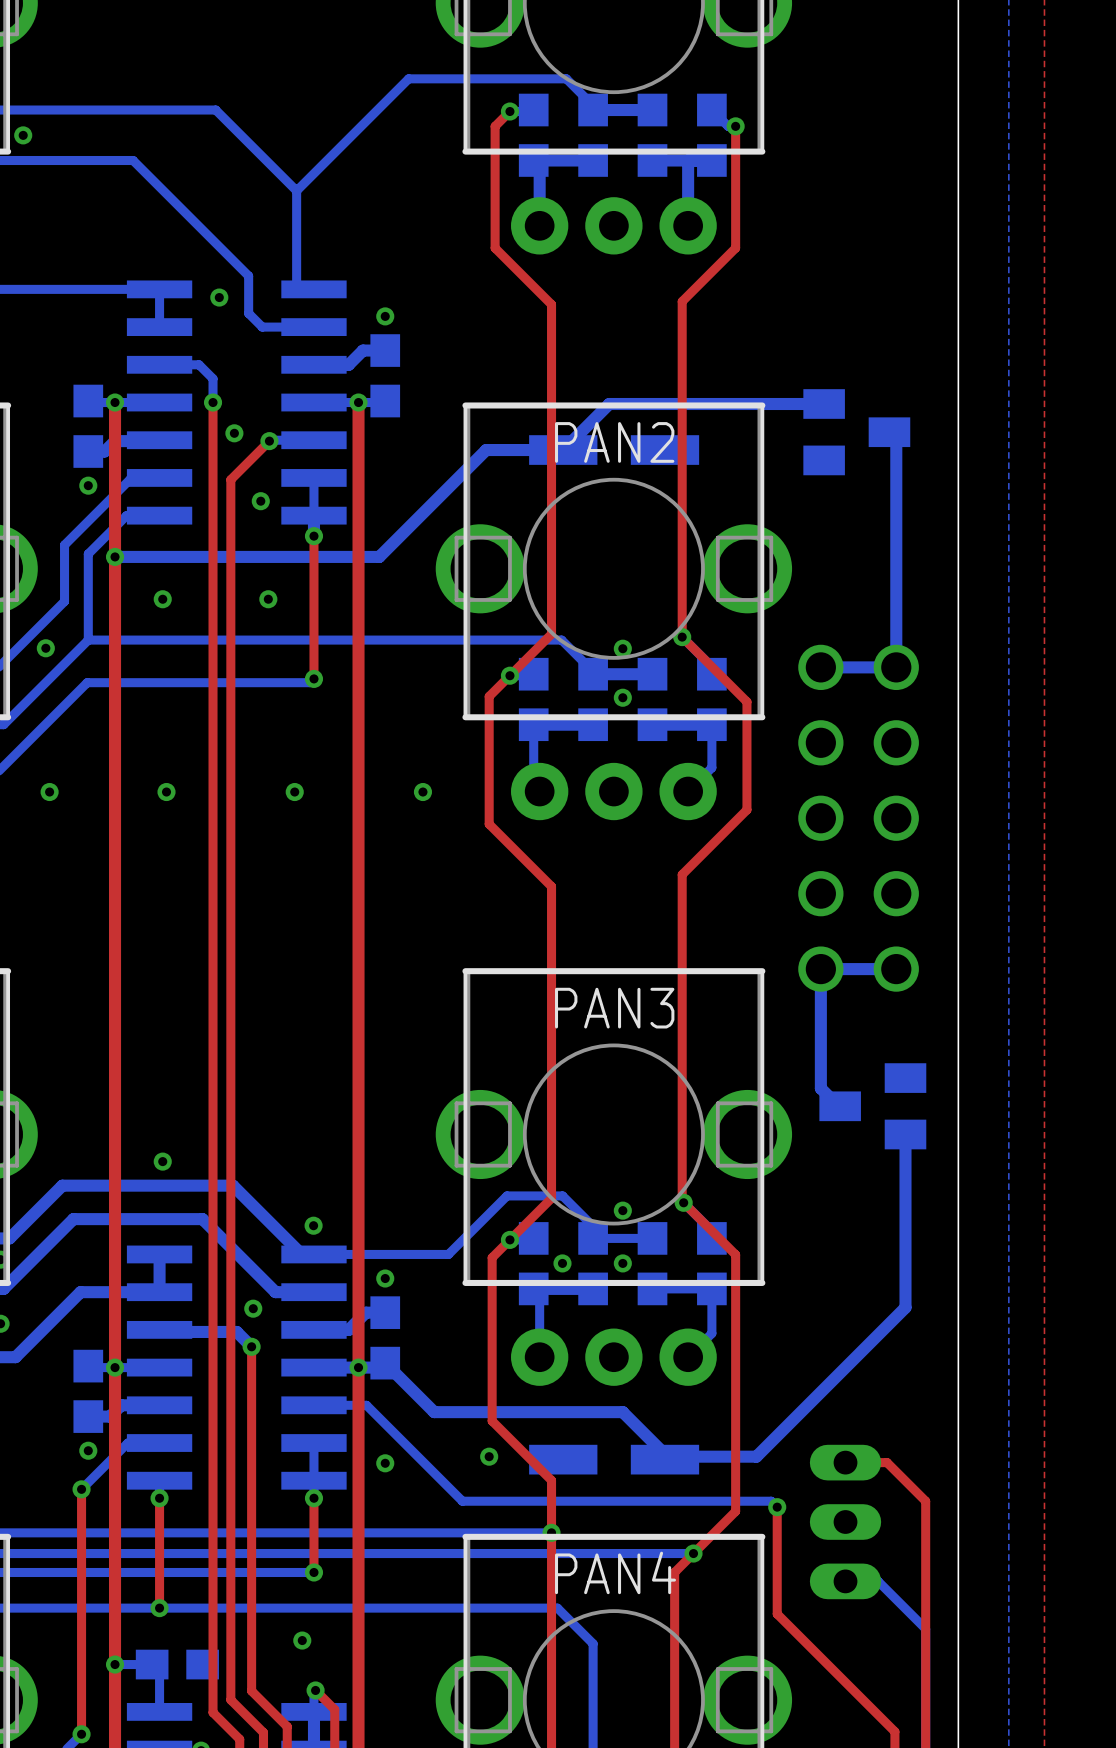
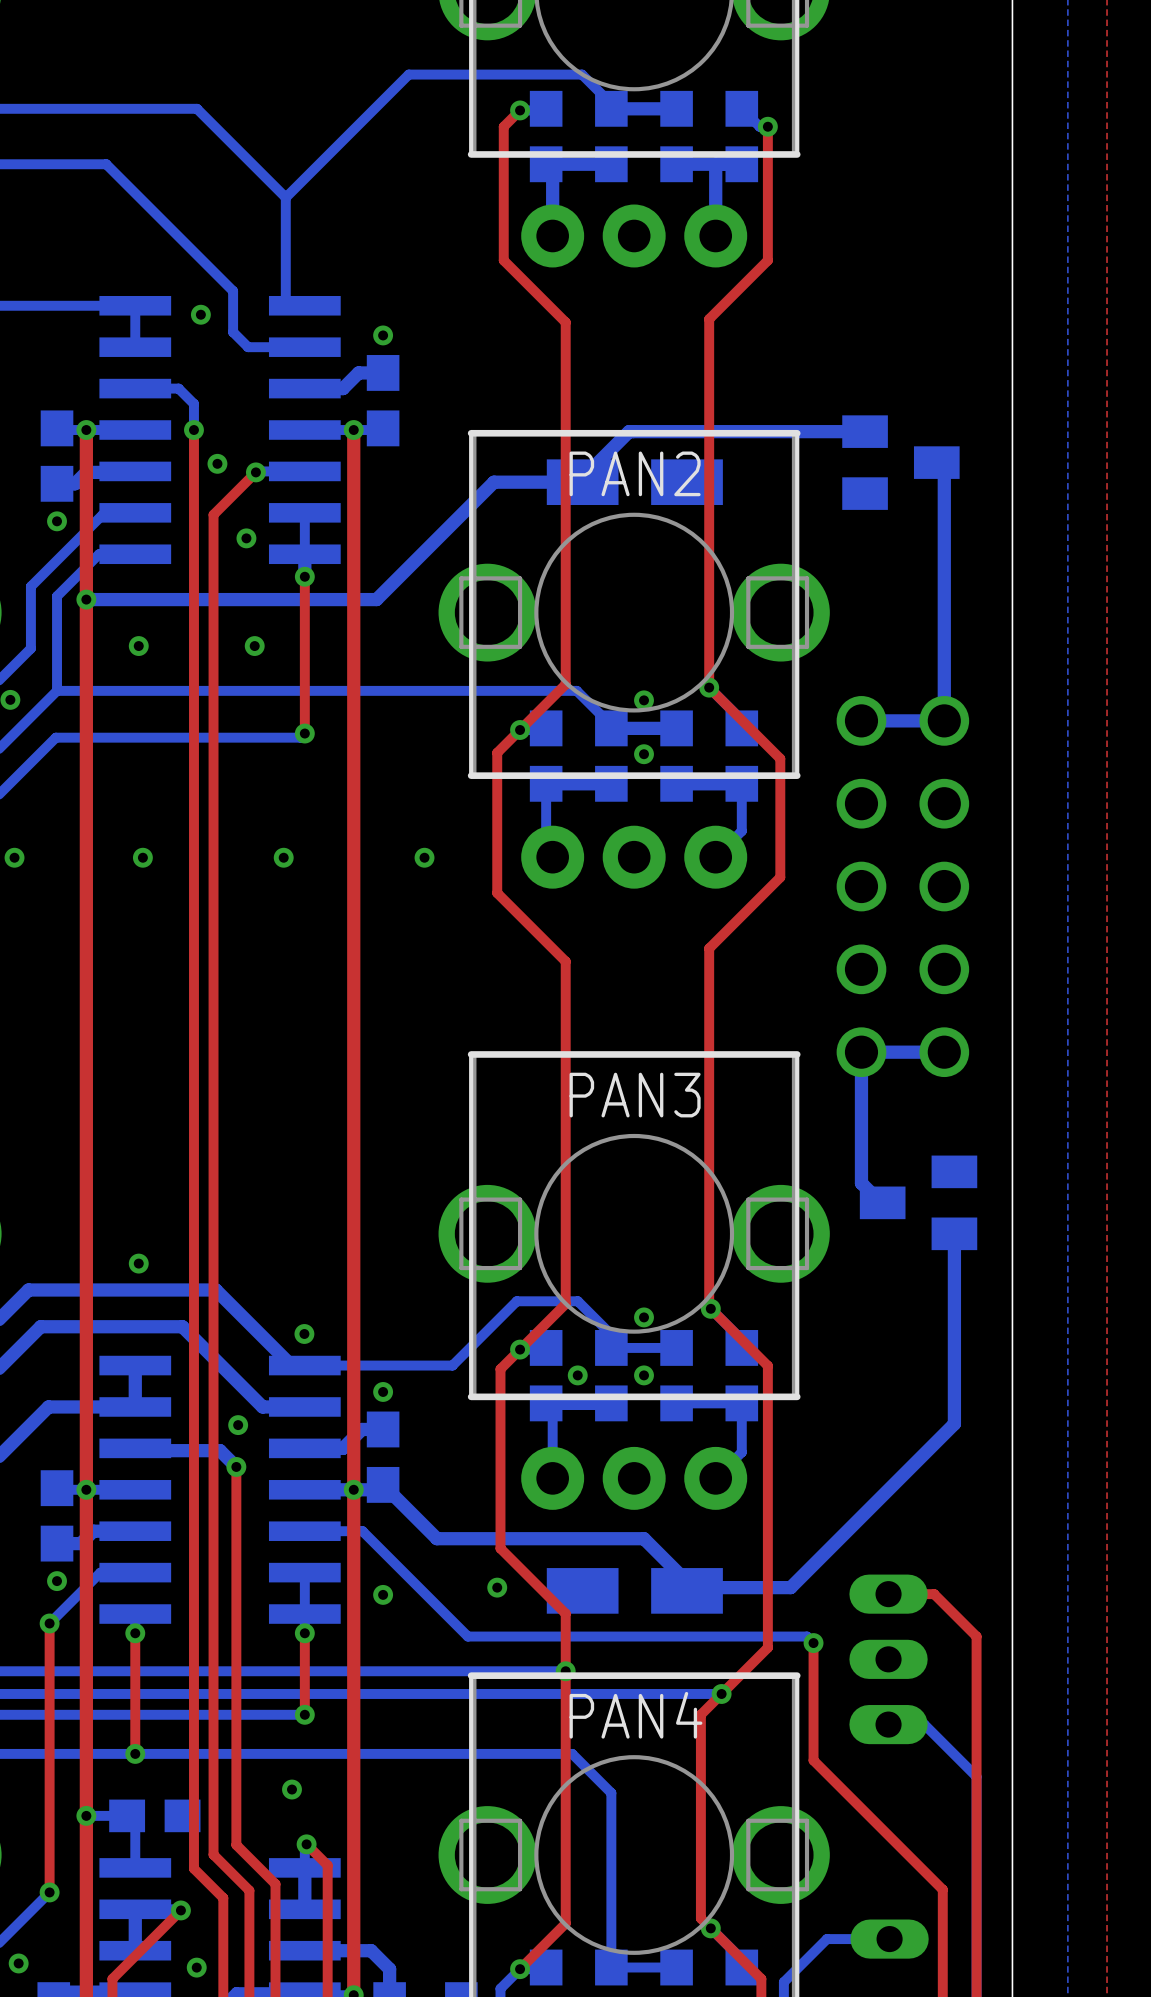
part footprint: [529, 435, 700, 465] -> [546, 459, 723, 506]
part footprint: [529, 1444, 700, 1475] -> [546, 1568, 723, 1614]

